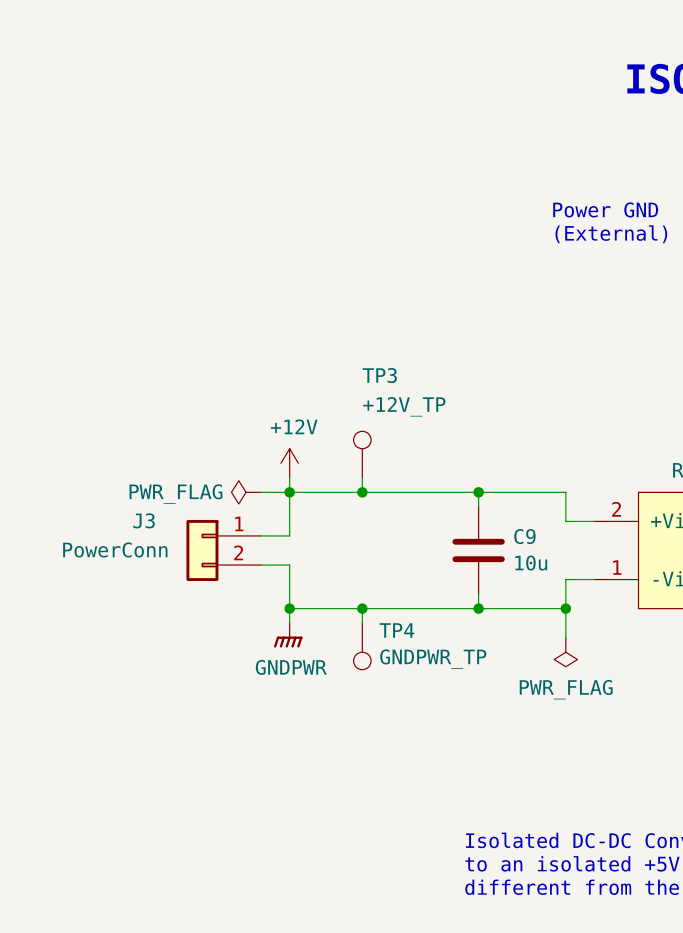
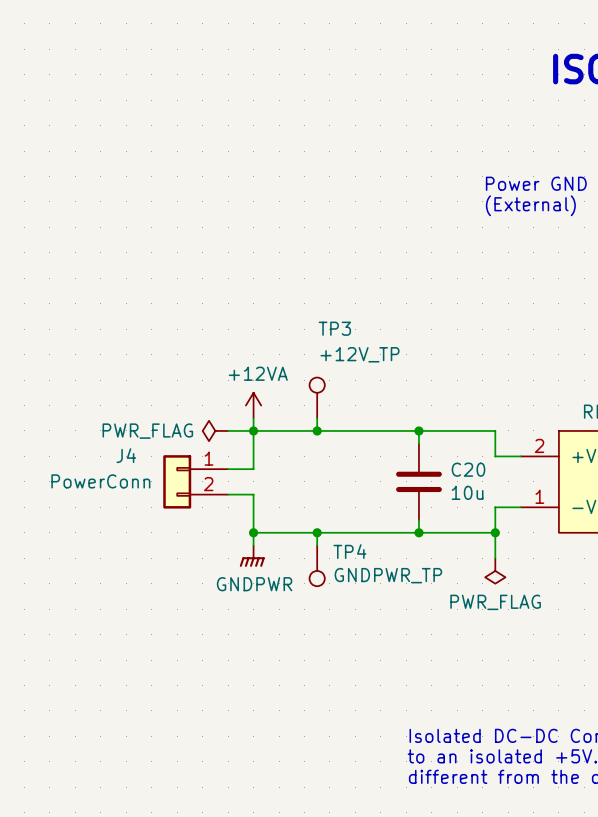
power symbol: +12V (289, 463) -> +12VA (253, 405)
J3 name: J3 (144, 520) -> J4 (126, 455)
C9 name: C9 (524, 536) -> C20 (468, 469)

